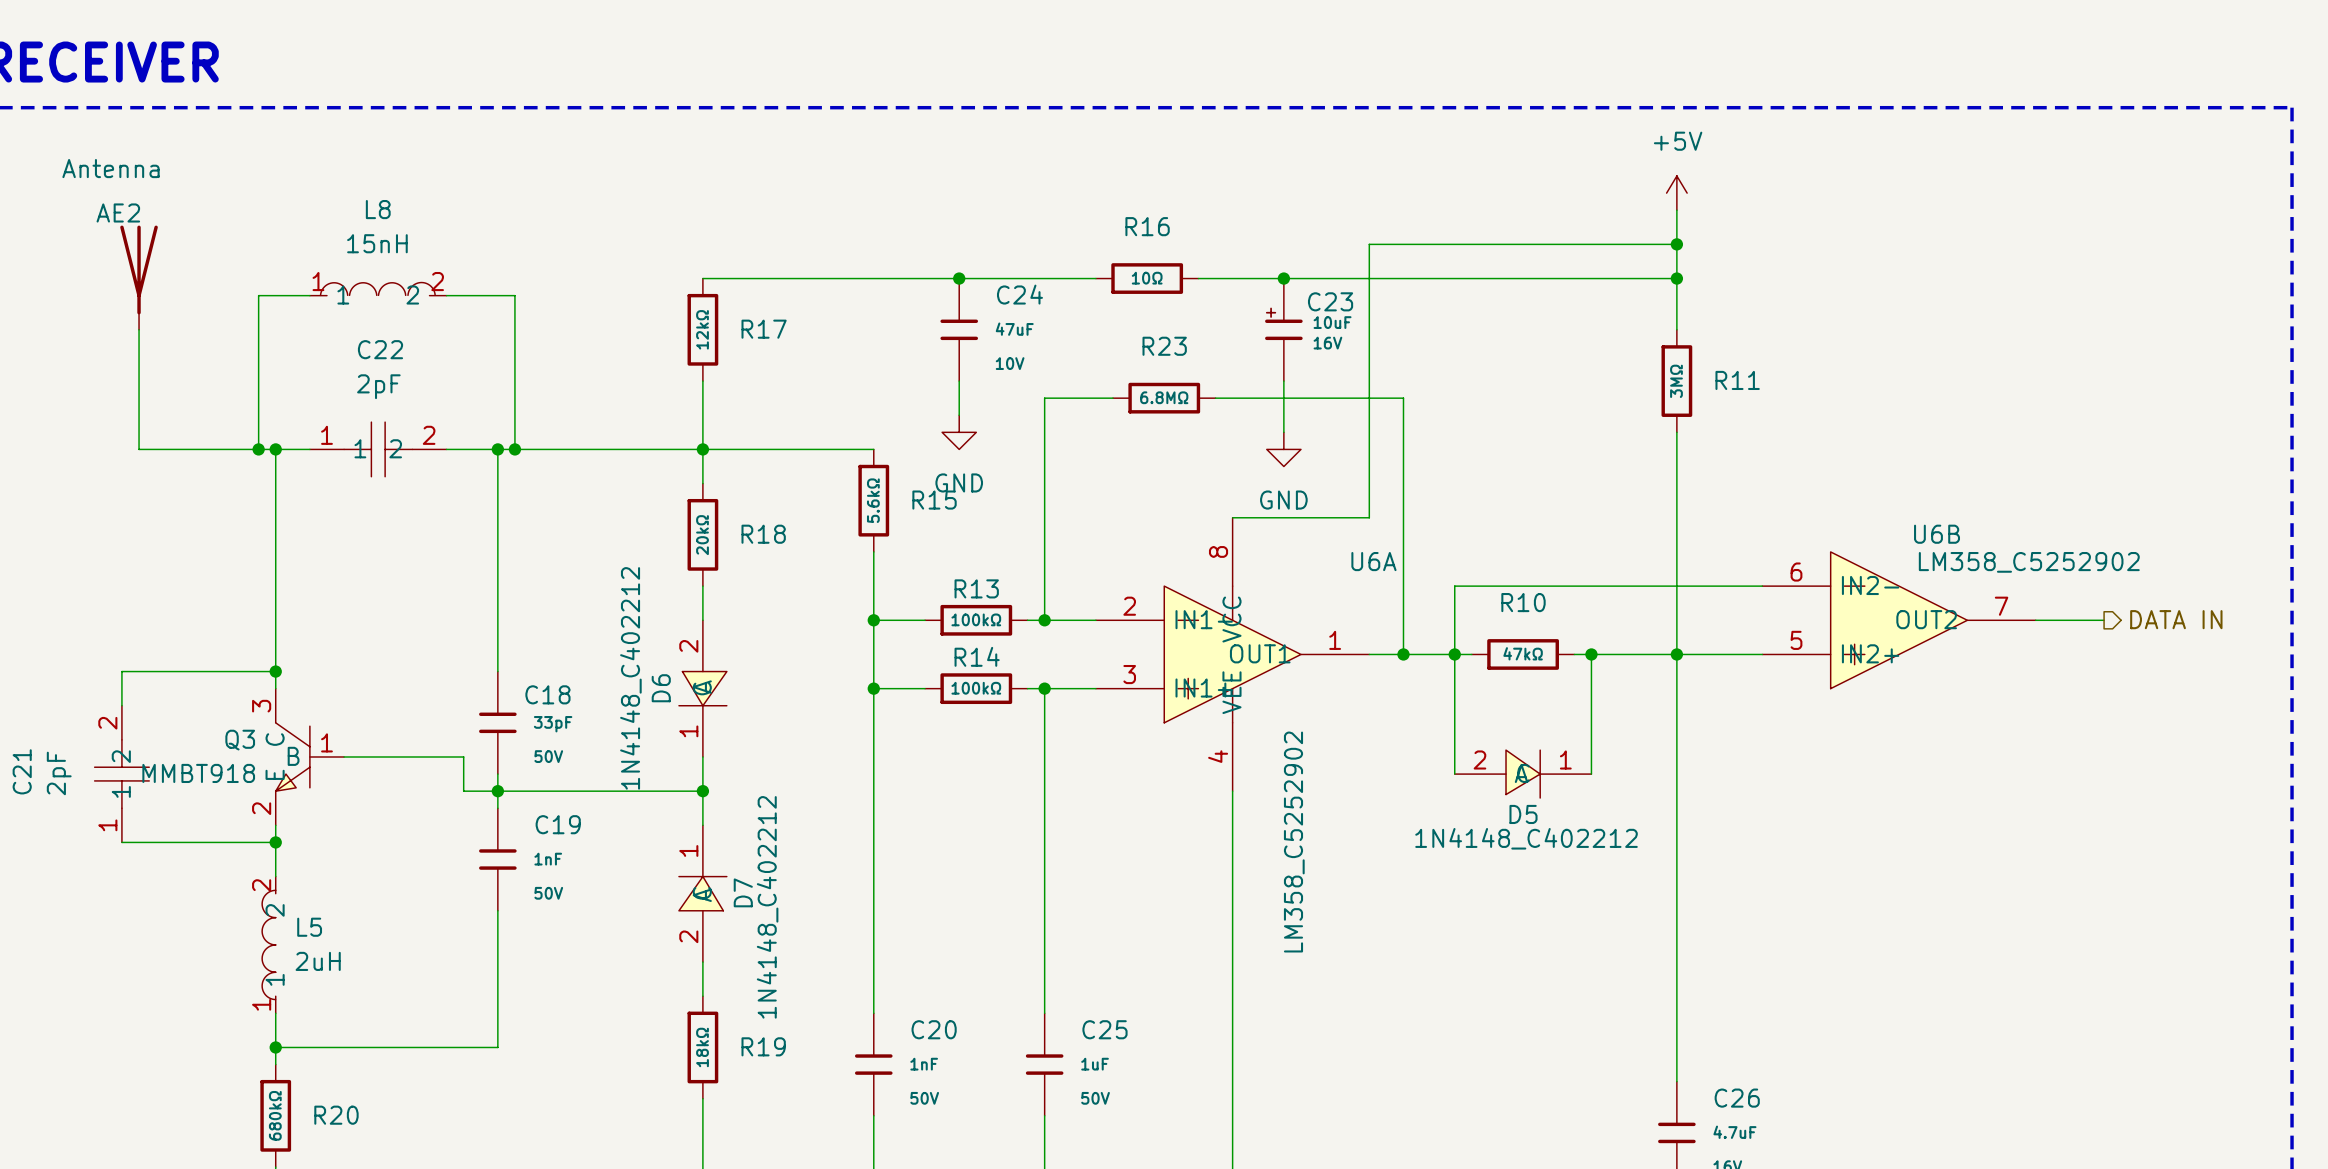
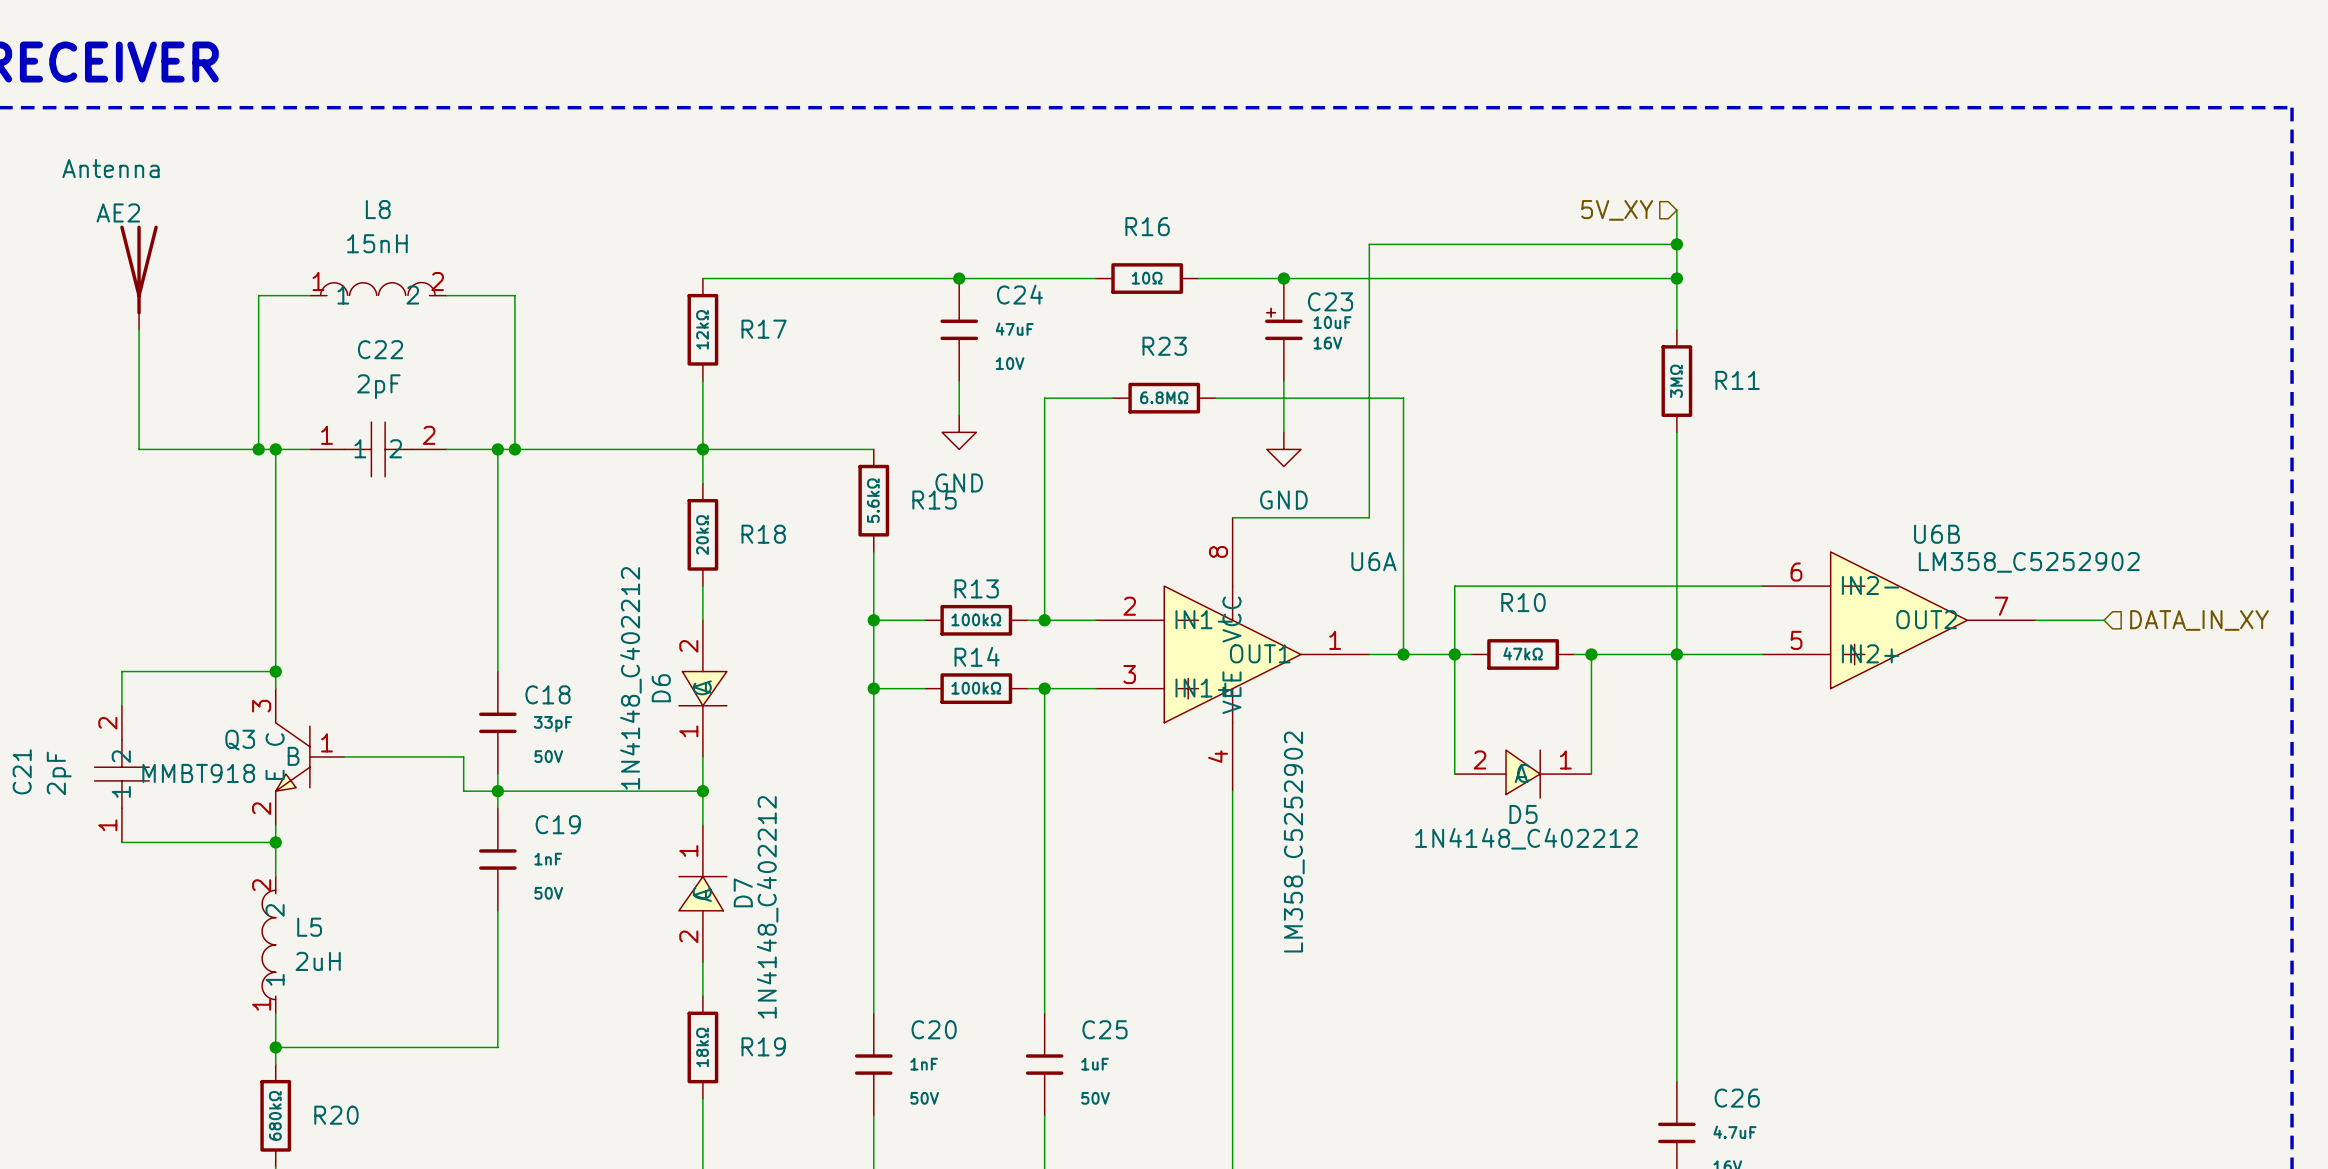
power symbol: +5V (1676, 193) -> none
hierarchical label: none -> 5V_XY (1617, 210)
hierarchical label shape: output (2176, 619) -> input (2199, 620)
hierarchical label: DATA IN (2176, 619) -> DATA_IN_XY (2199, 620)

